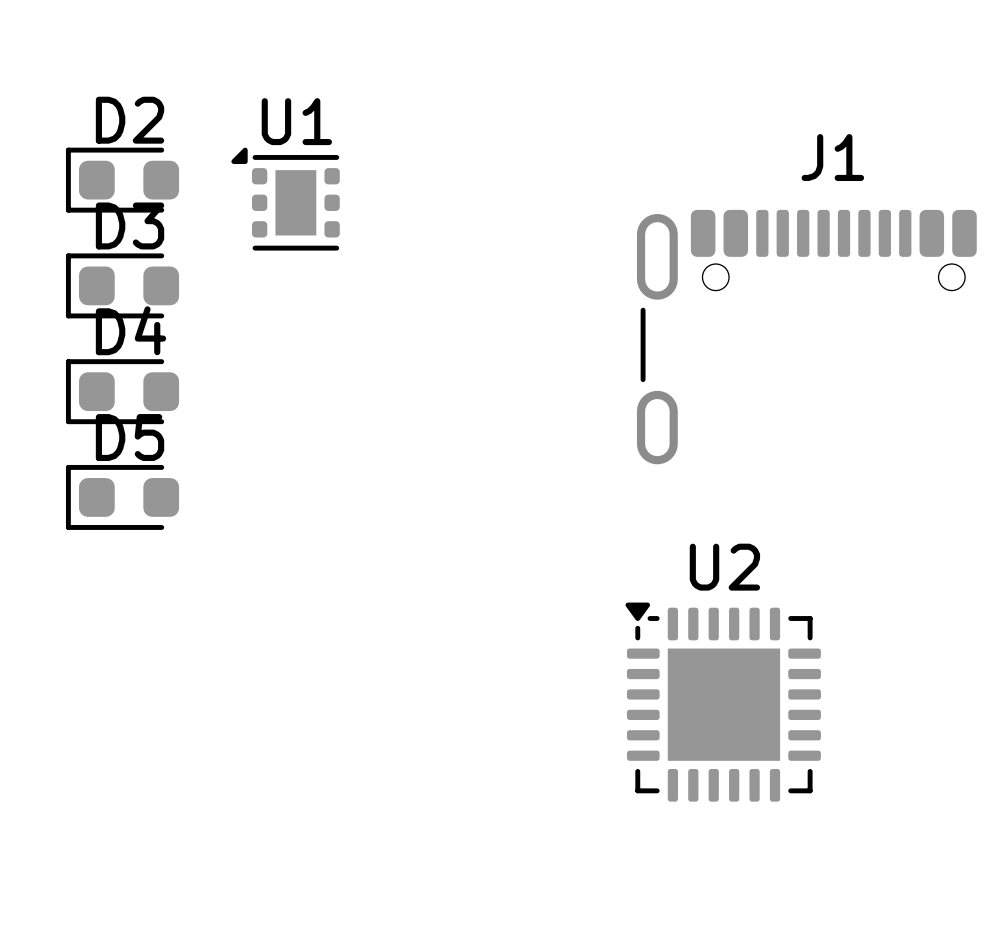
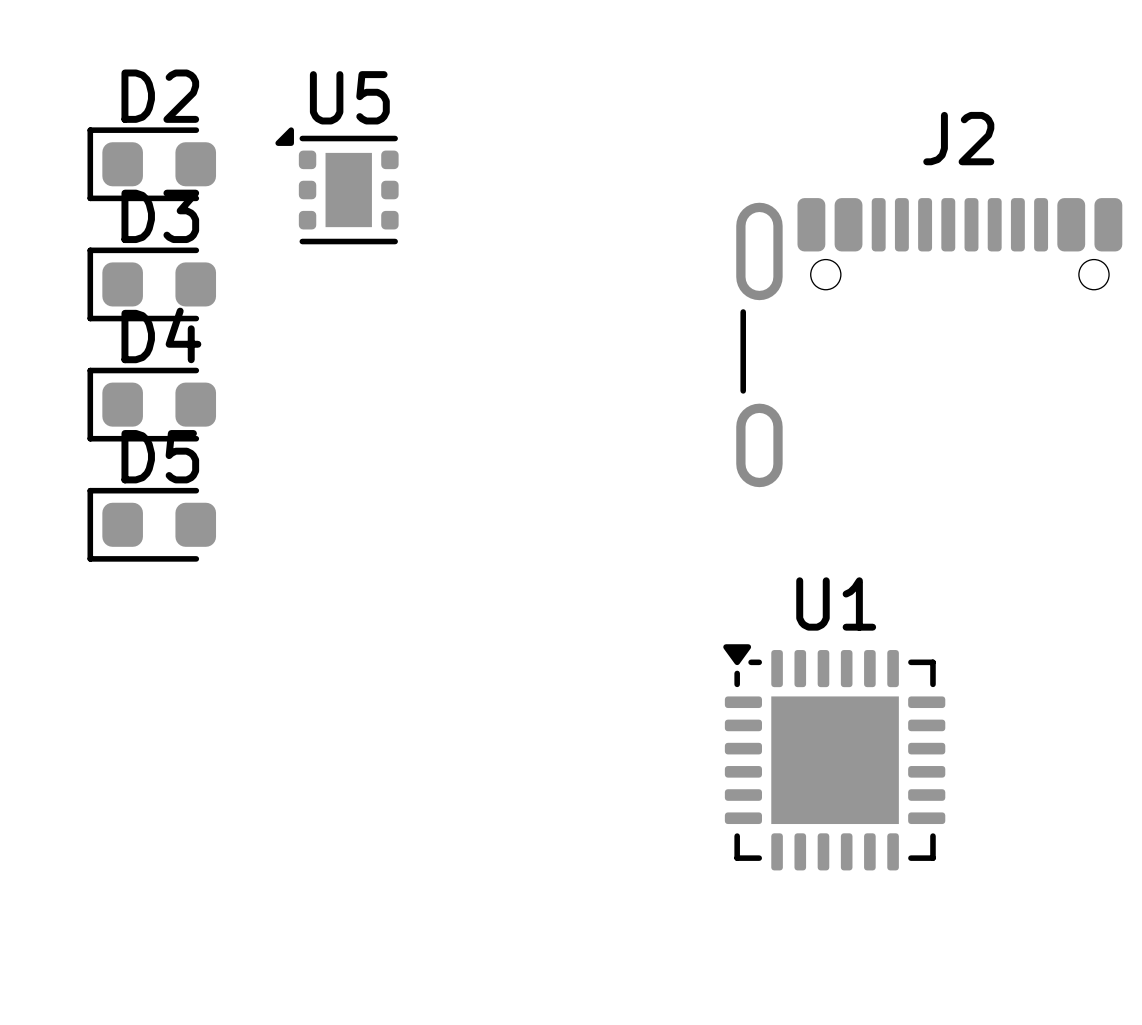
U1 name: U1 (296, 121) -> U5 (349, 97)
J1 name: J1 (832, 157) -> J2 (958, 138)
U2 name: U2 (724, 567) -> U1 (836, 603)

